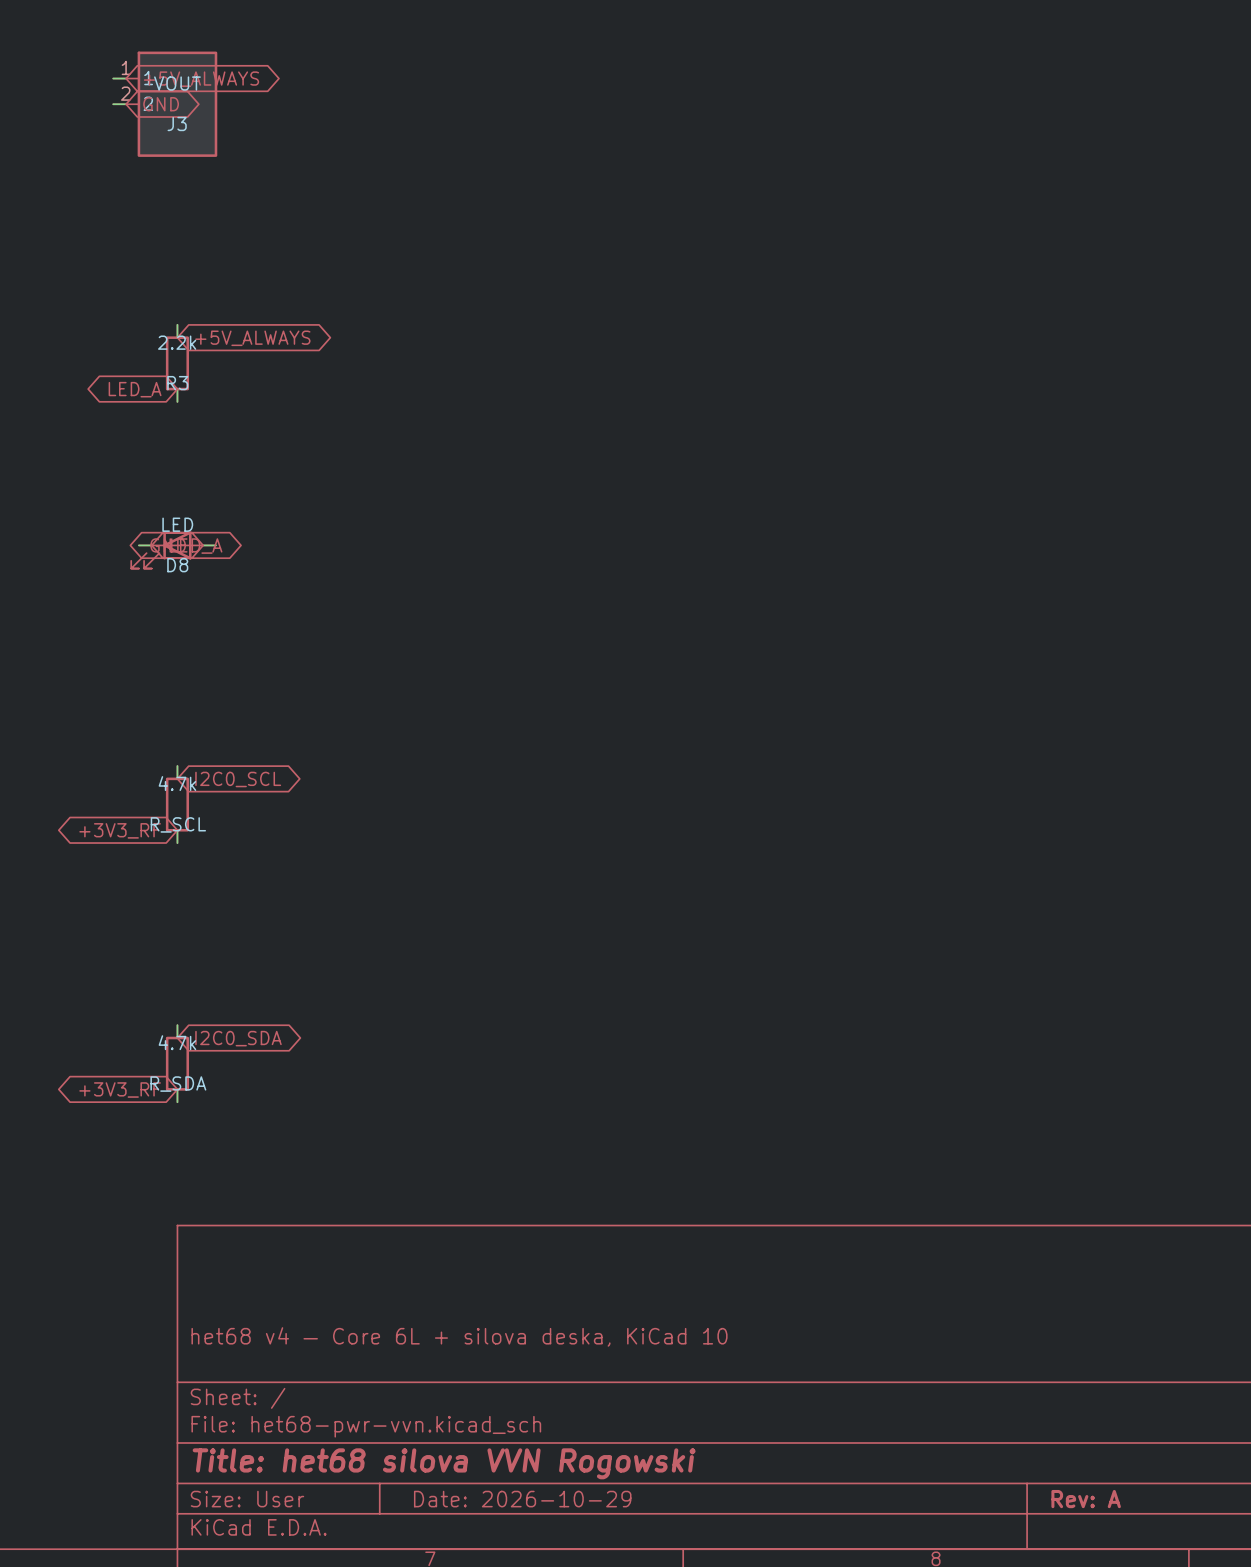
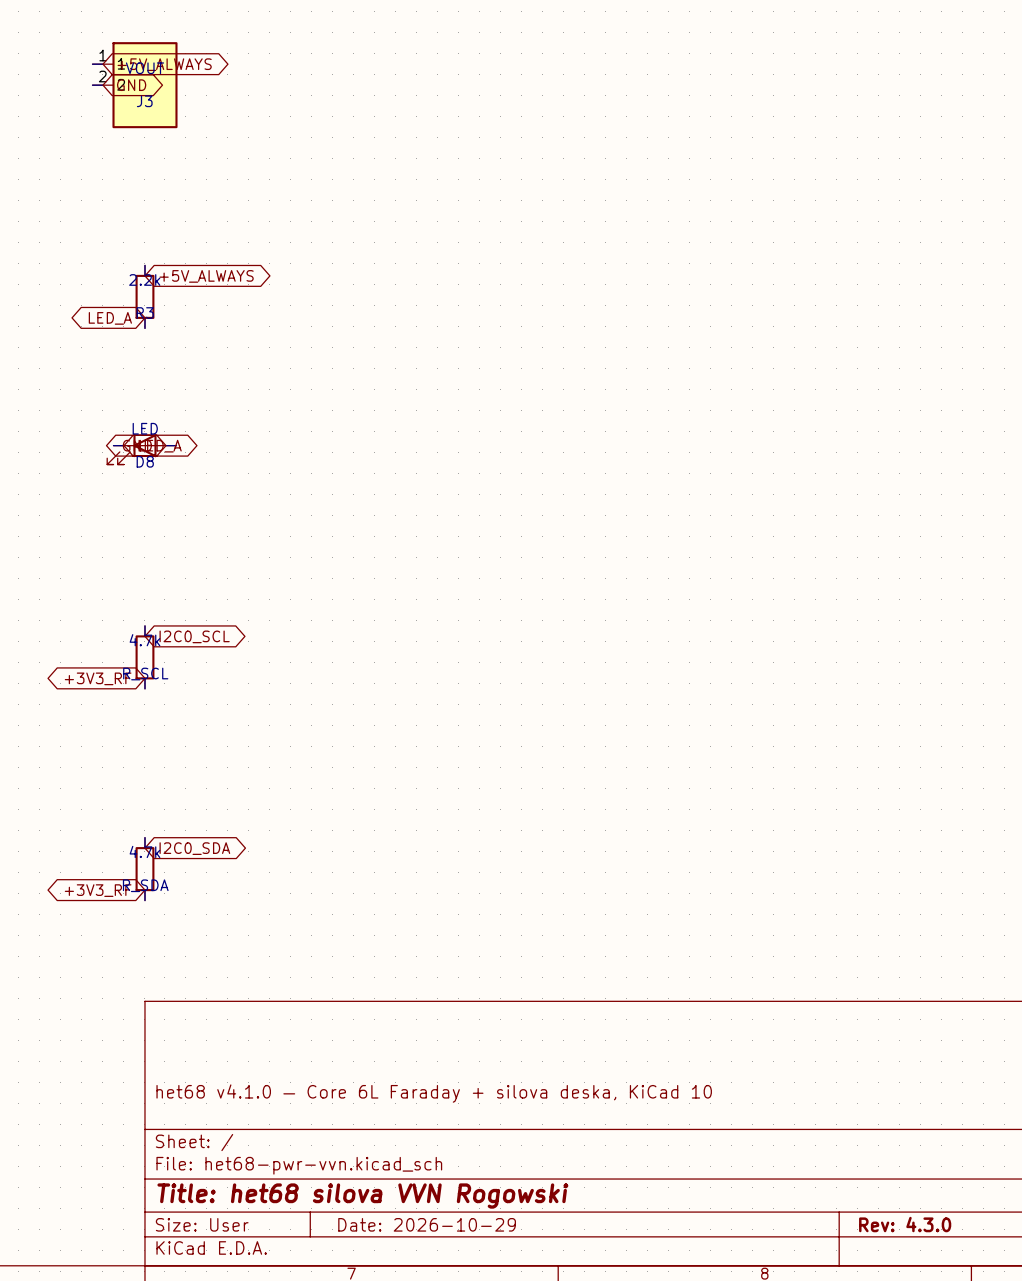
title block: het68 v4 — Core 6L + silova deska, KiCad 10 (459, 1336) -> het68 v4.1.0 — Core 6L Faraday + silova deska, KiCad 10 (434, 1093)
title block: Rev: A (1086, 1499) -> Rev: 4.3.0 (905, 1224)

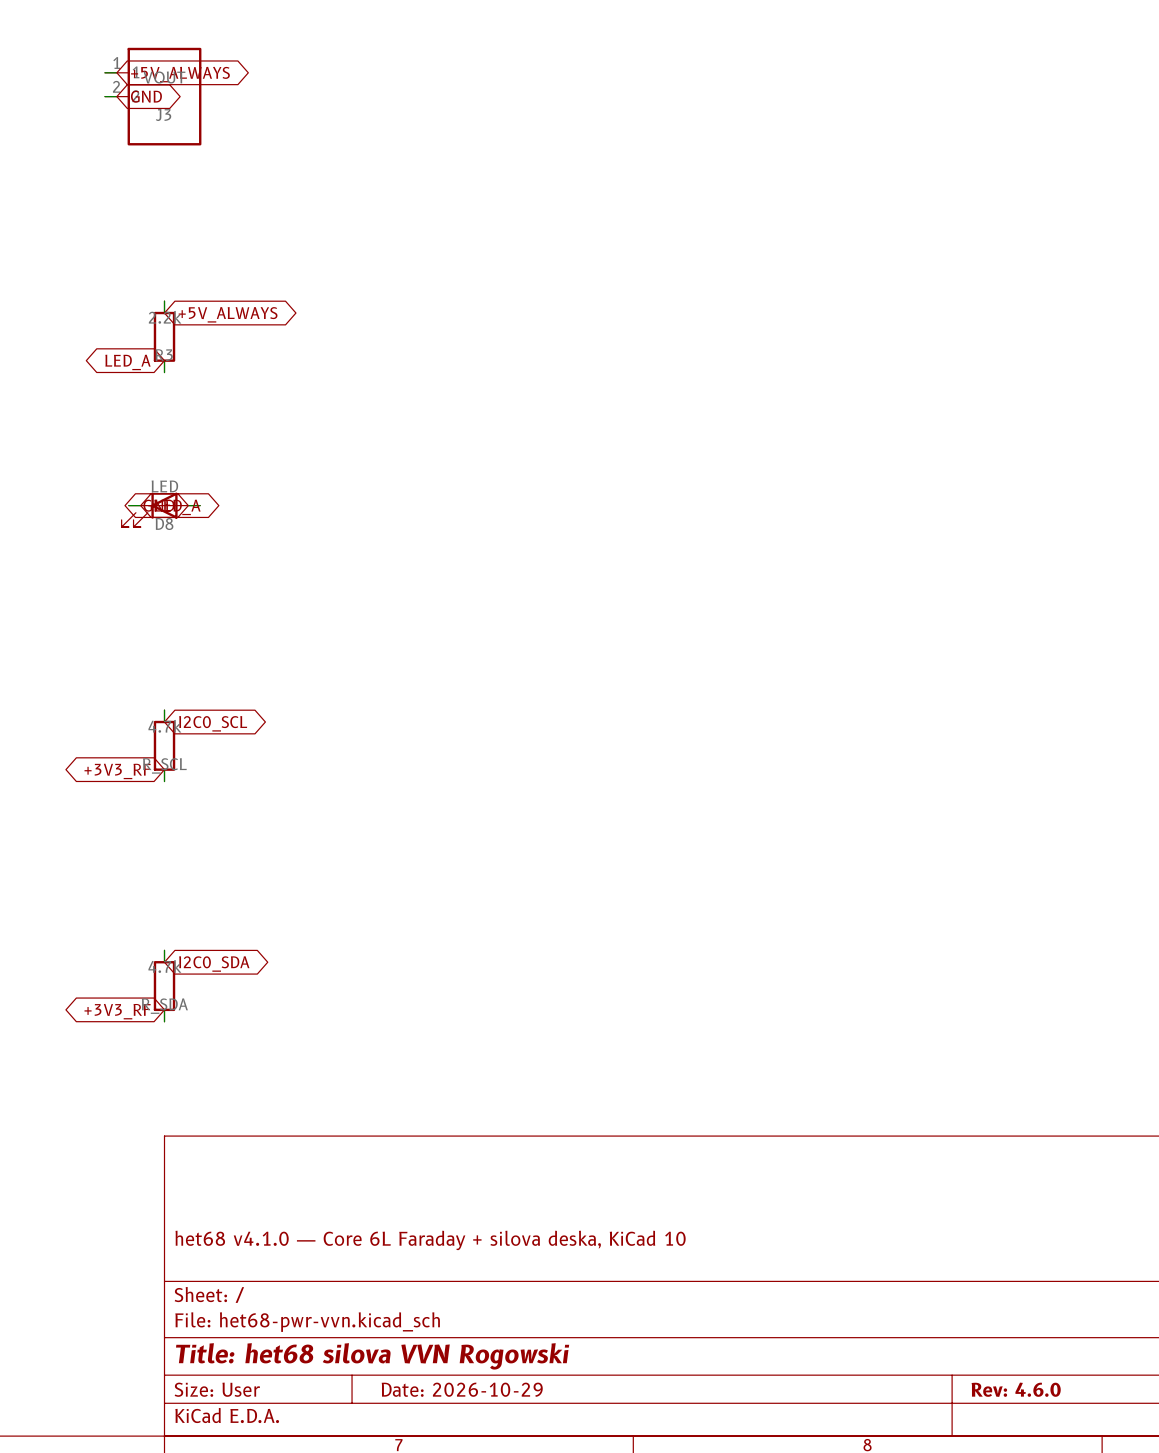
title block: Rev: 4.3.0 (905, 1224) -> Rev: 4.6.0 (1016, 1389)

